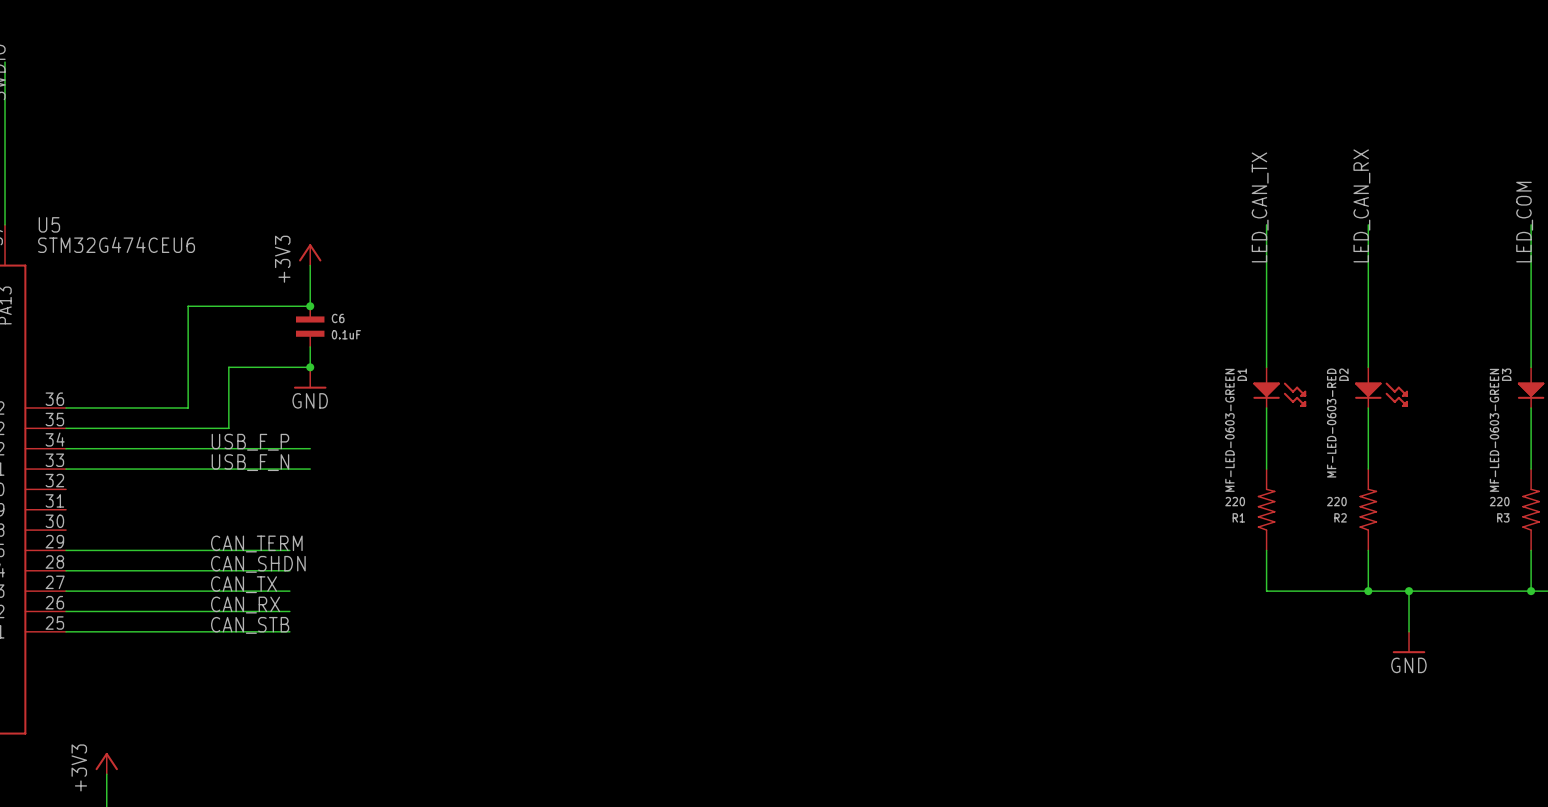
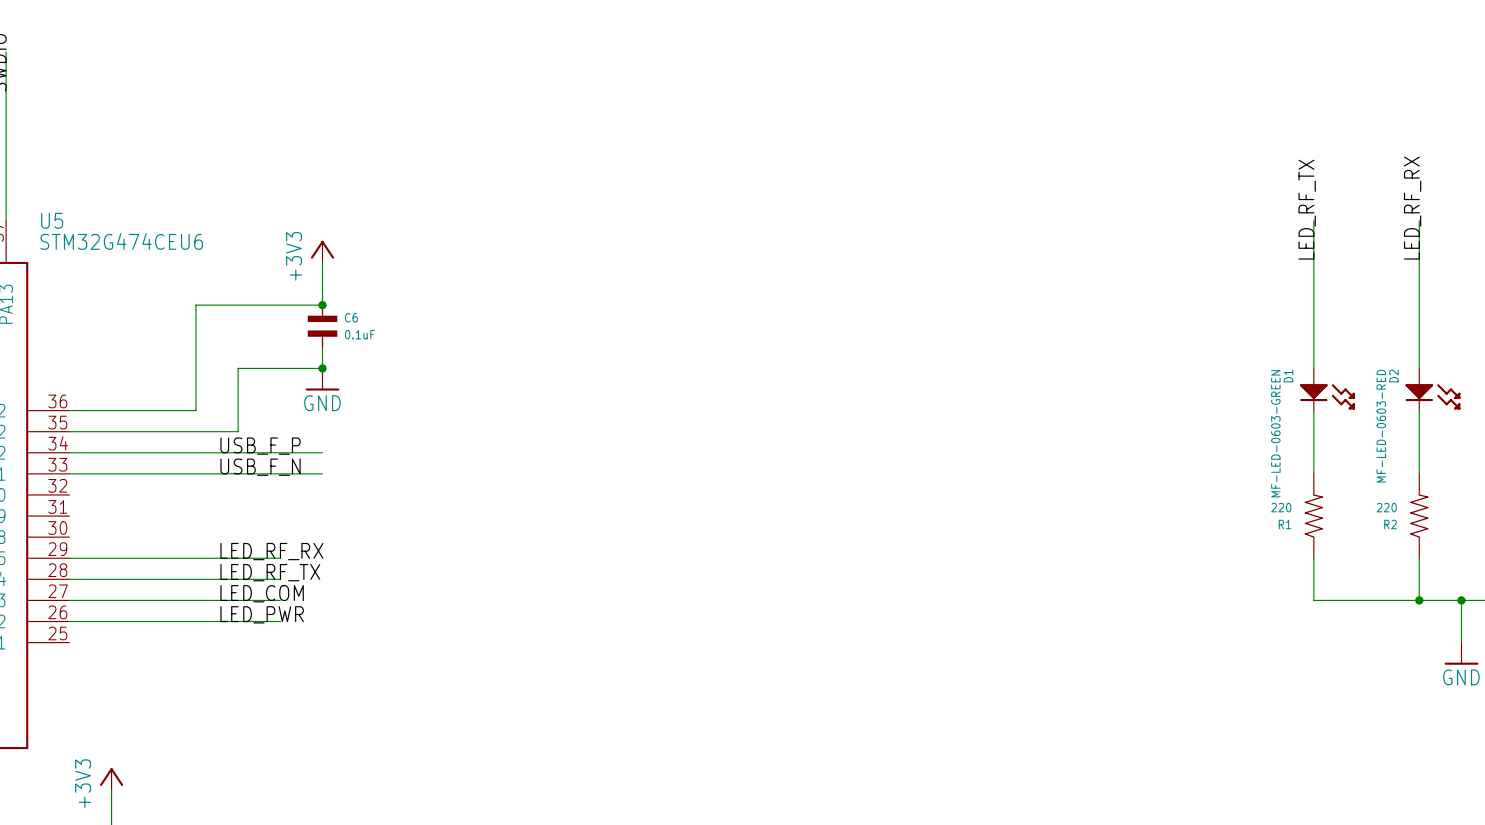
label: LED_CAN_RX (1361, 205) -> LED_RF_RX (1412, 208)
label: LED_CAN_TX (1260, 207) -> LED_RF_TX (1307, 209)
label: CAN_TERM (256, 543) -> LED_RF_RX (271, 551)
wire: (269, 550) (289, 550) -> none
label: CAN_SHDN (258, 564) -> LED_RF_TX (270, 572)
wire: (269, 570) (289, 570) -> none
label: CAN_TX (244, 584) -> LED_COM (262, 593)
wire: (269, 591) (289, 591) -> none
label: CAN_RX (245, 605) -> LED_PWR (262, 614)
wire: (269, 611) (289, 611) -> none
label: CAN_STB (250, 625) -> none
wire: (66, 631) (289, 631) -> none

